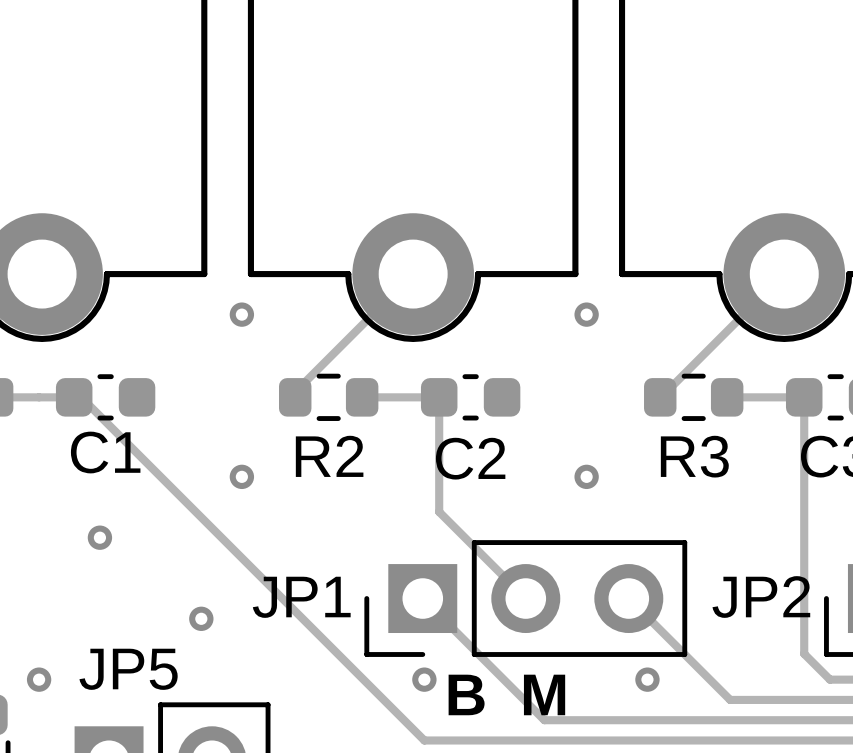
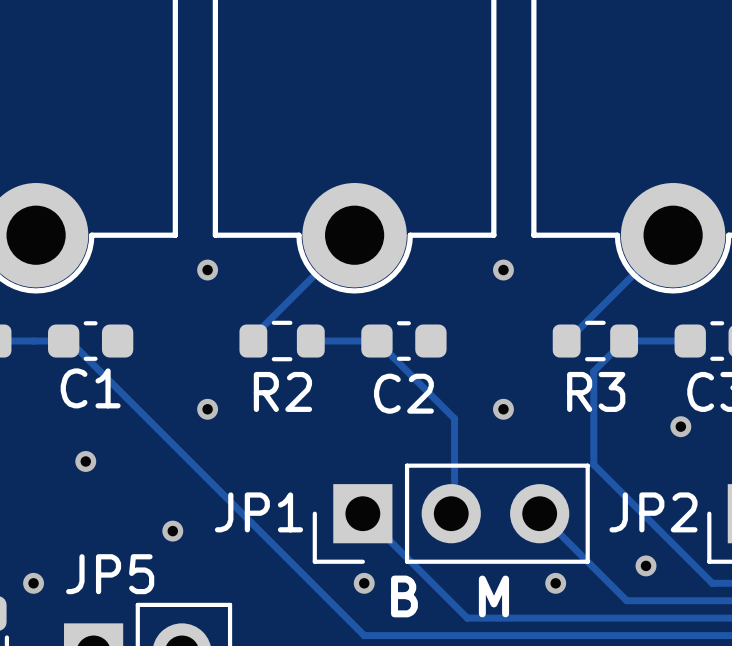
track: (439, 397) (439, 511) (525, 598) -> (376, 341) (454, 418) (454, 510) (451, 513)
track: (804, 397) (804, 653) -> (624, 341) (593, 371) (593, 464) (690, 561)
via: none -> (680, 426)
via: none -> (646, 565)

